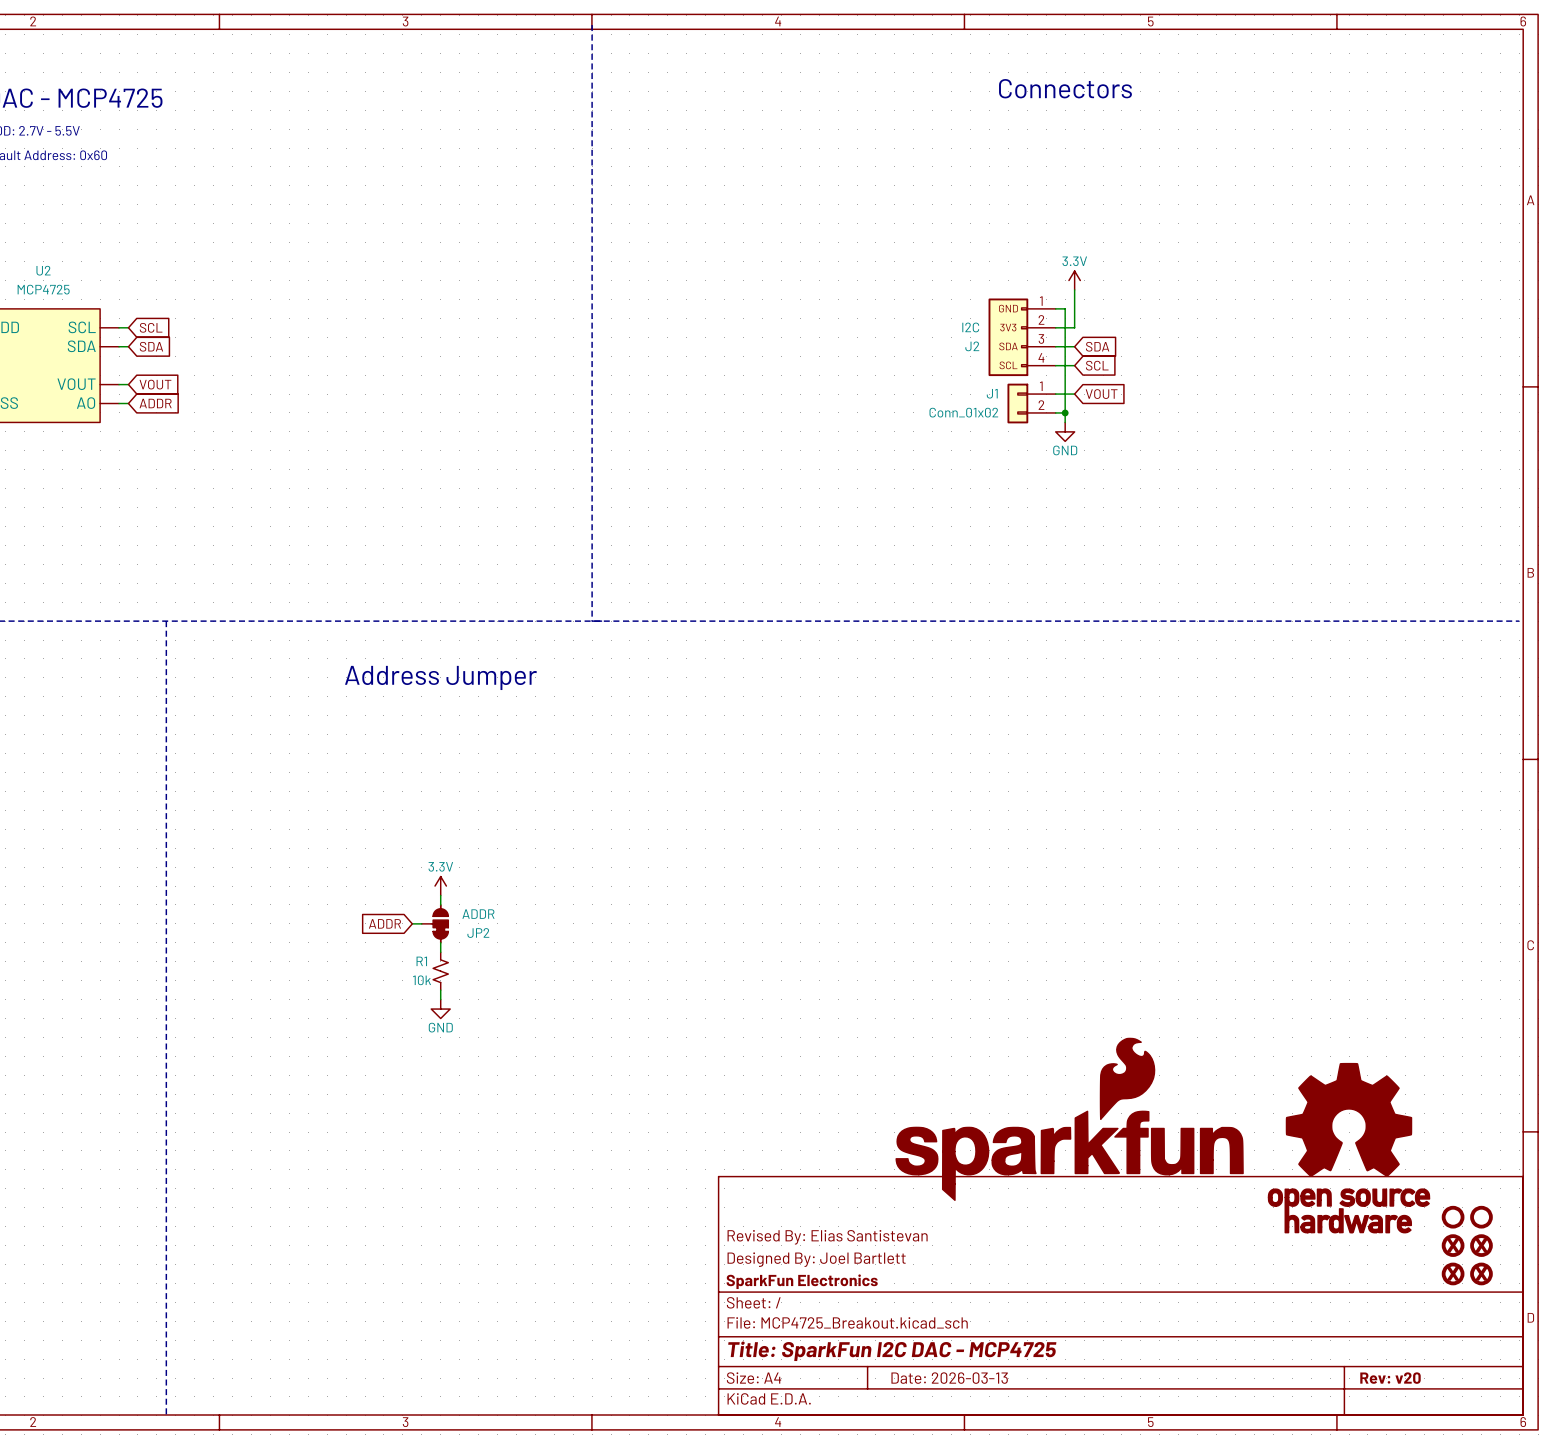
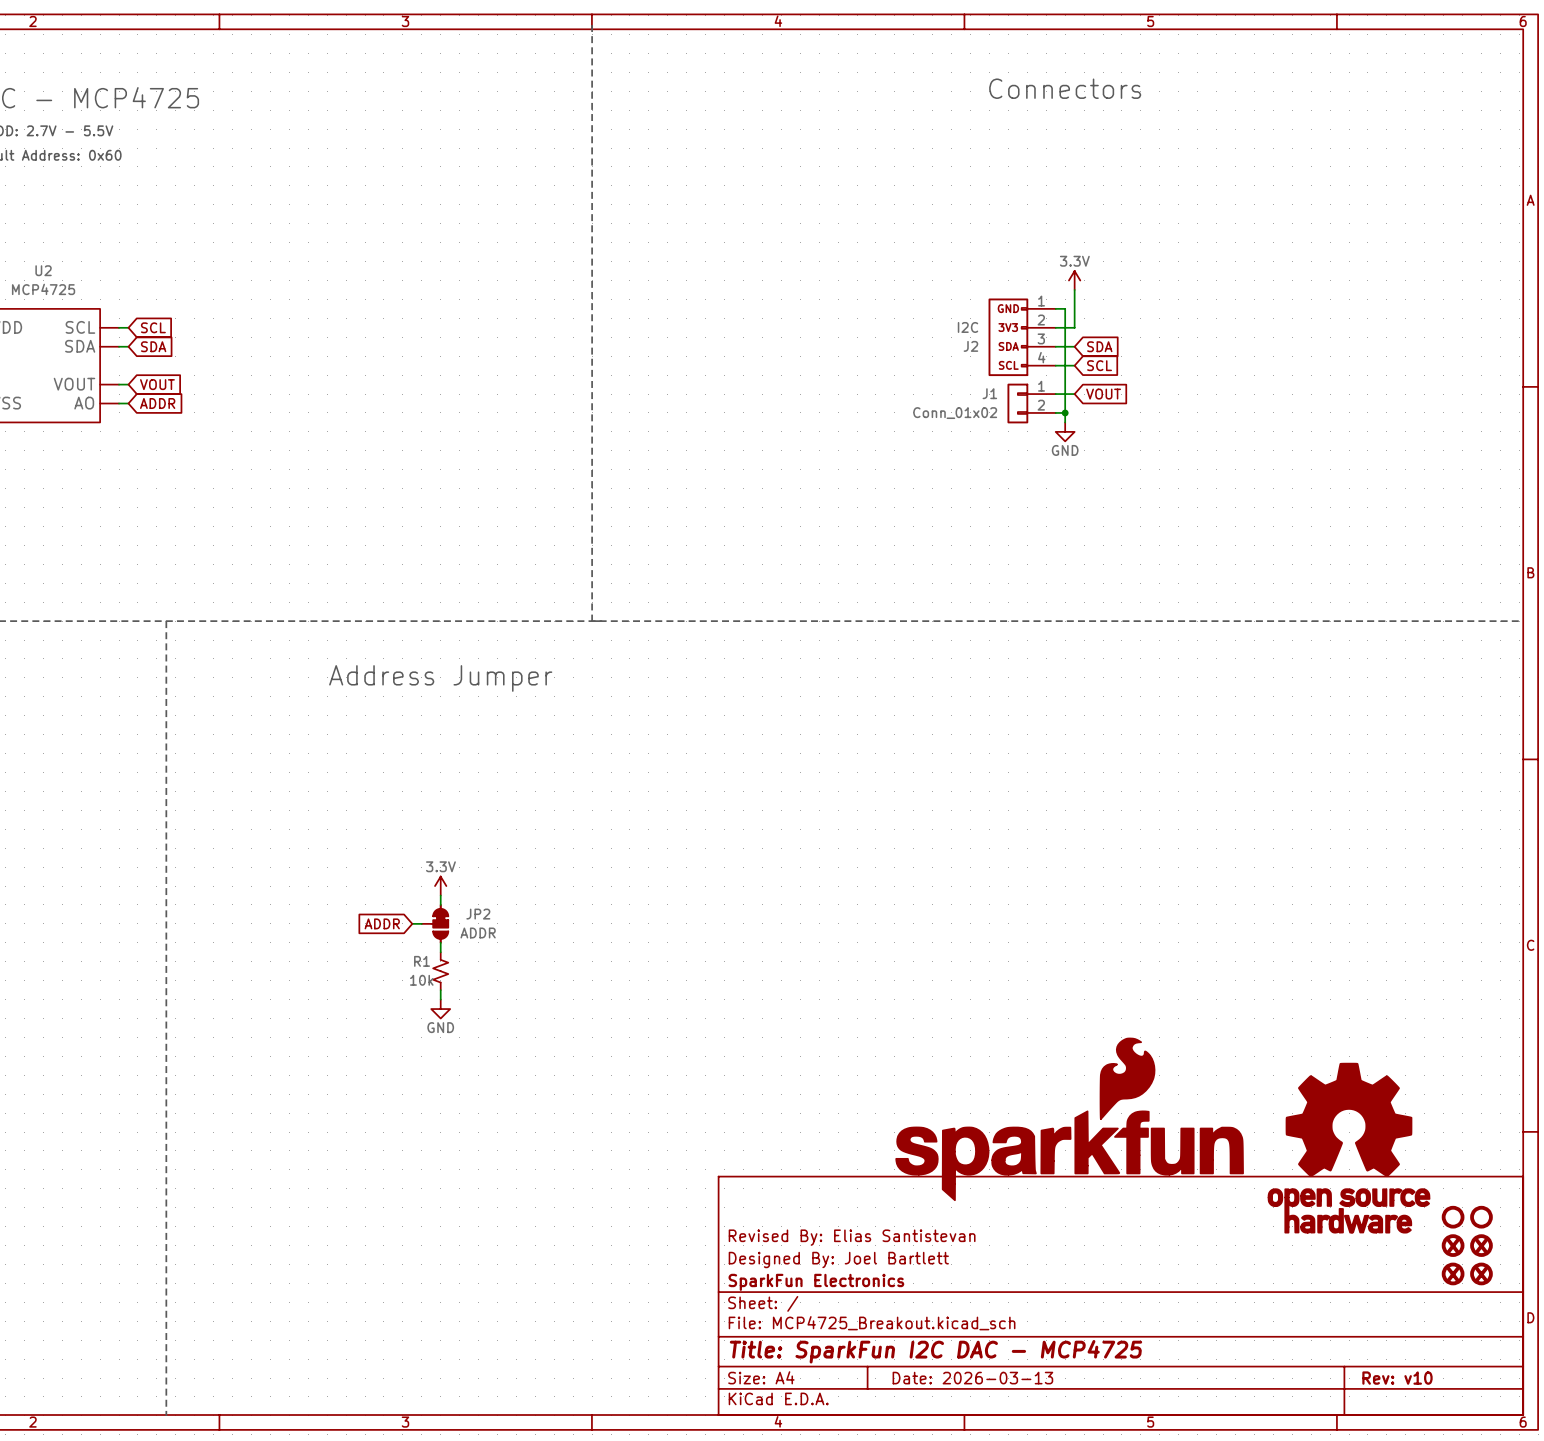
JP2 flip: as is (439, 923) -> up-down (439, 923)
title block: Rev: v20 (1390, 1378) -> Rev: v10 (1397, 1378)

